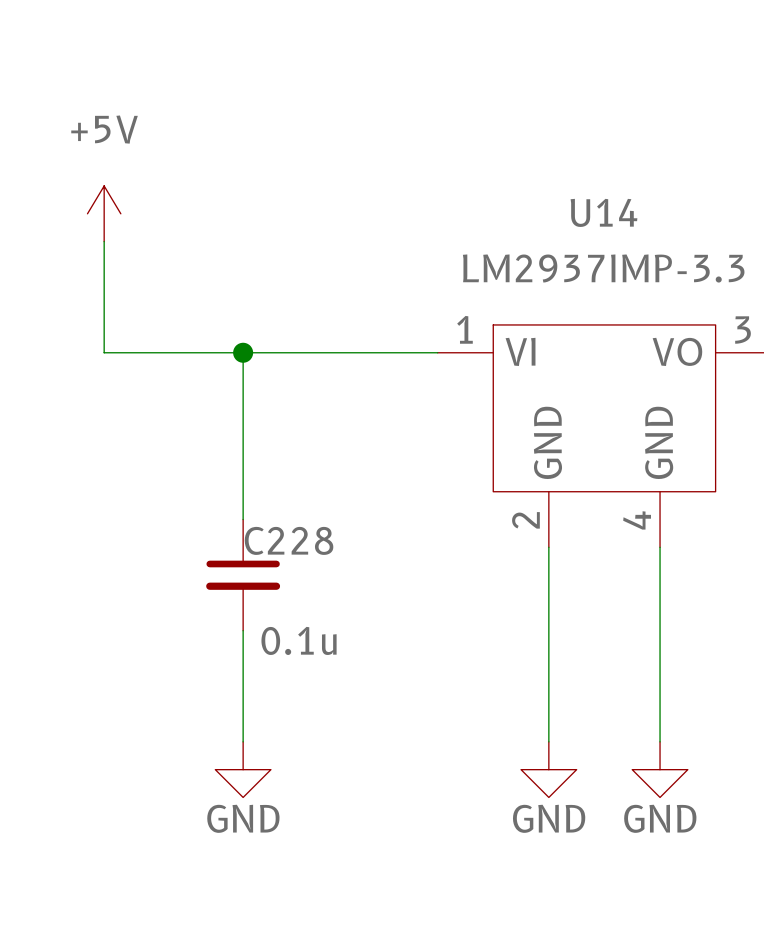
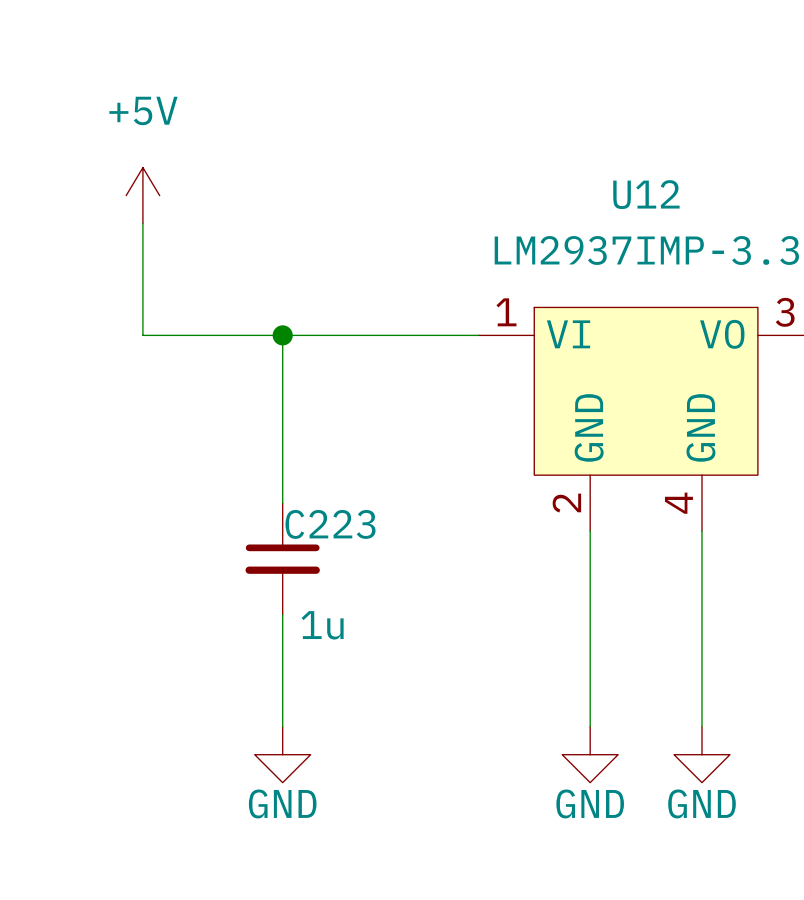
U14 name: U14 (603, 212) -> U12 (646, 194)
C228 name: C228 (289, 540) -> C223 (330, 524)
C228 value: 0.1u (299, 640) -> 1u (322, 625)

